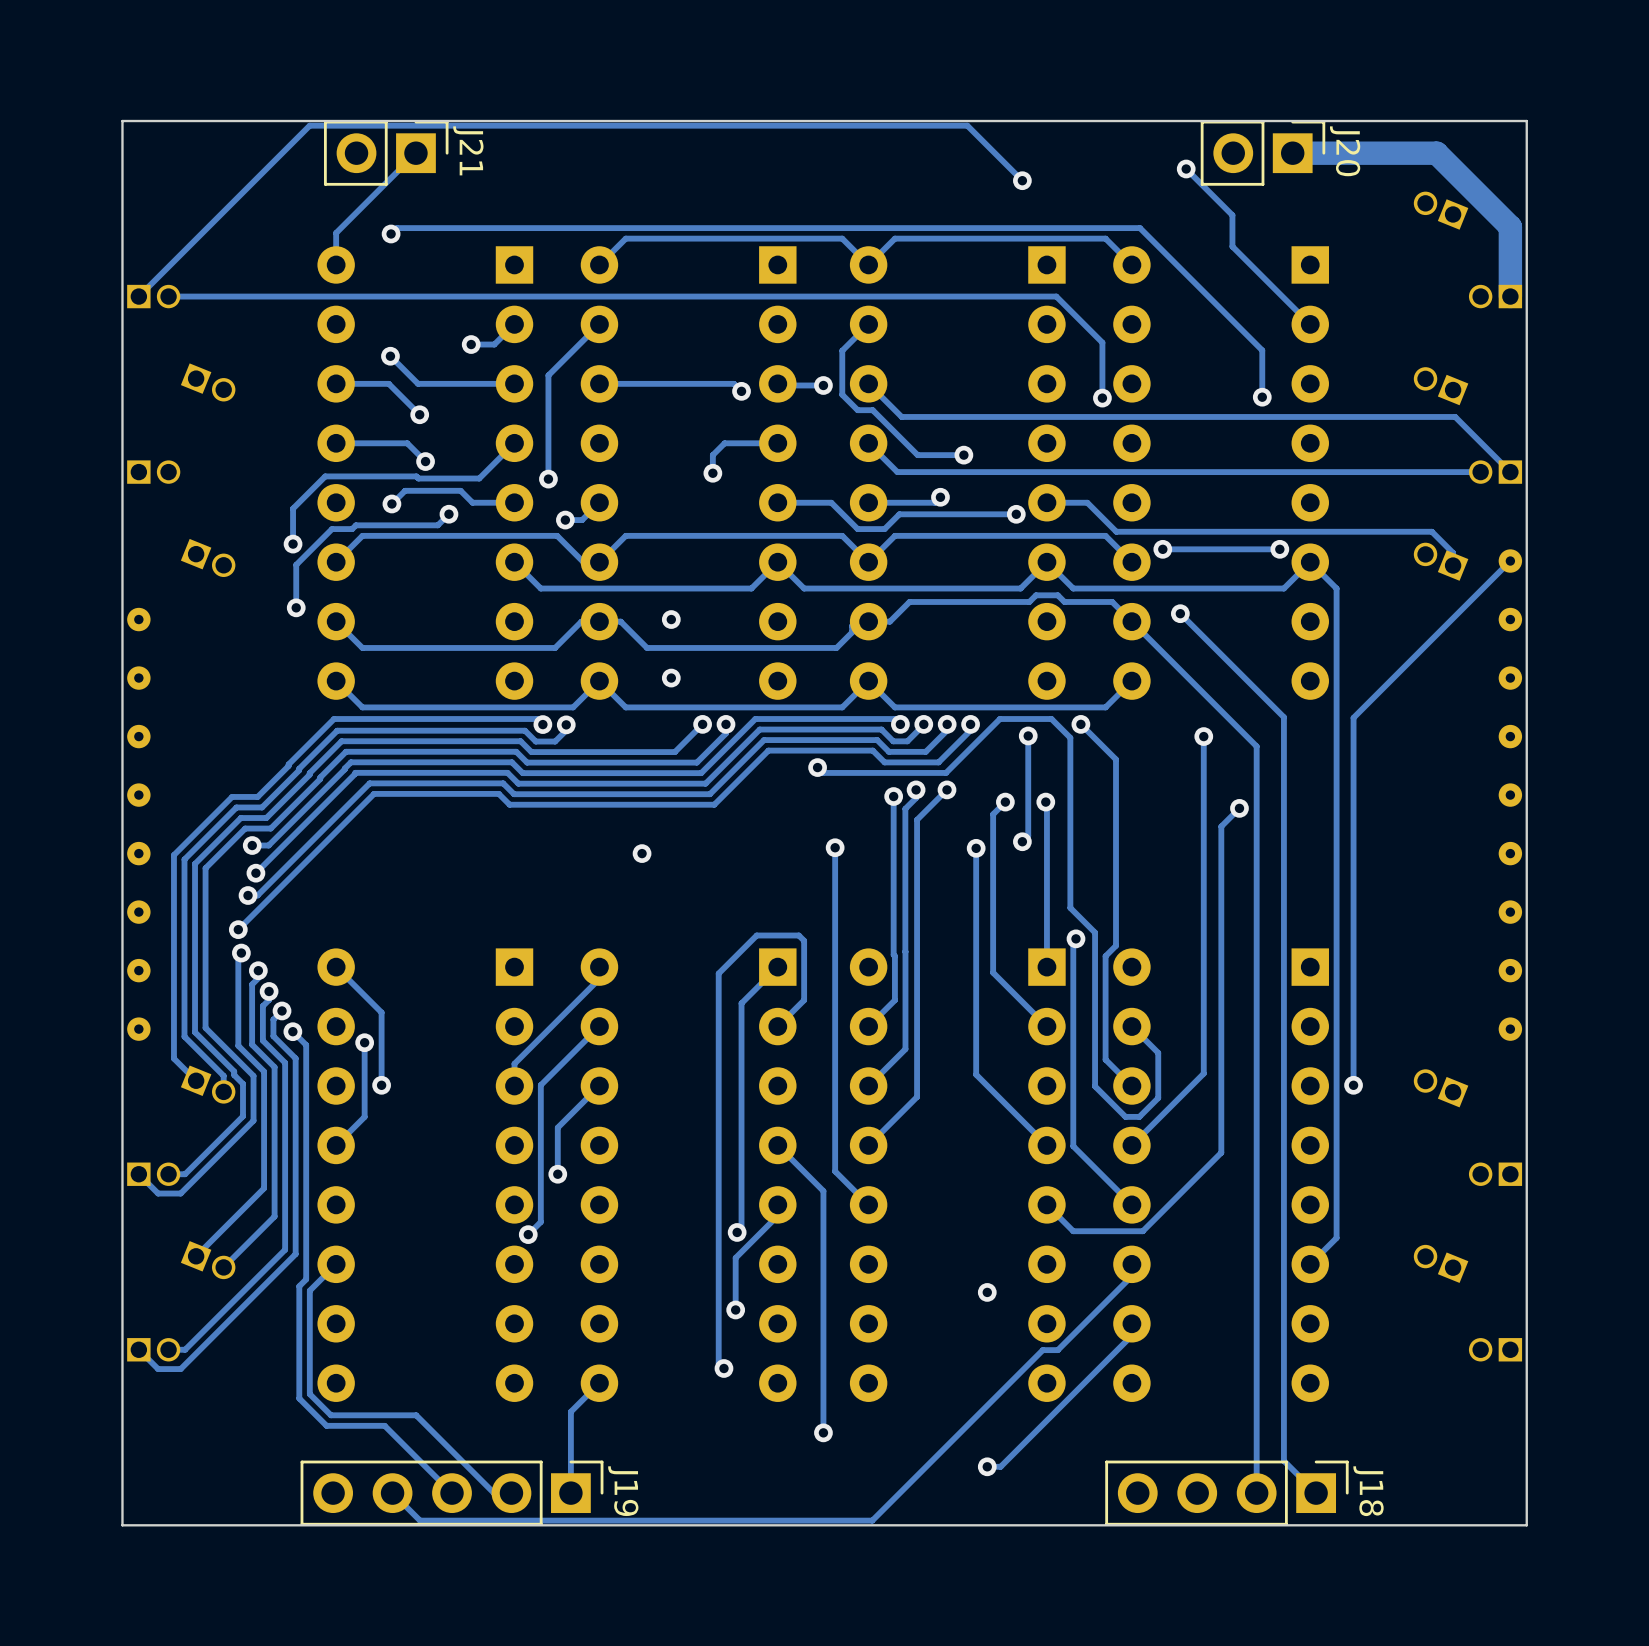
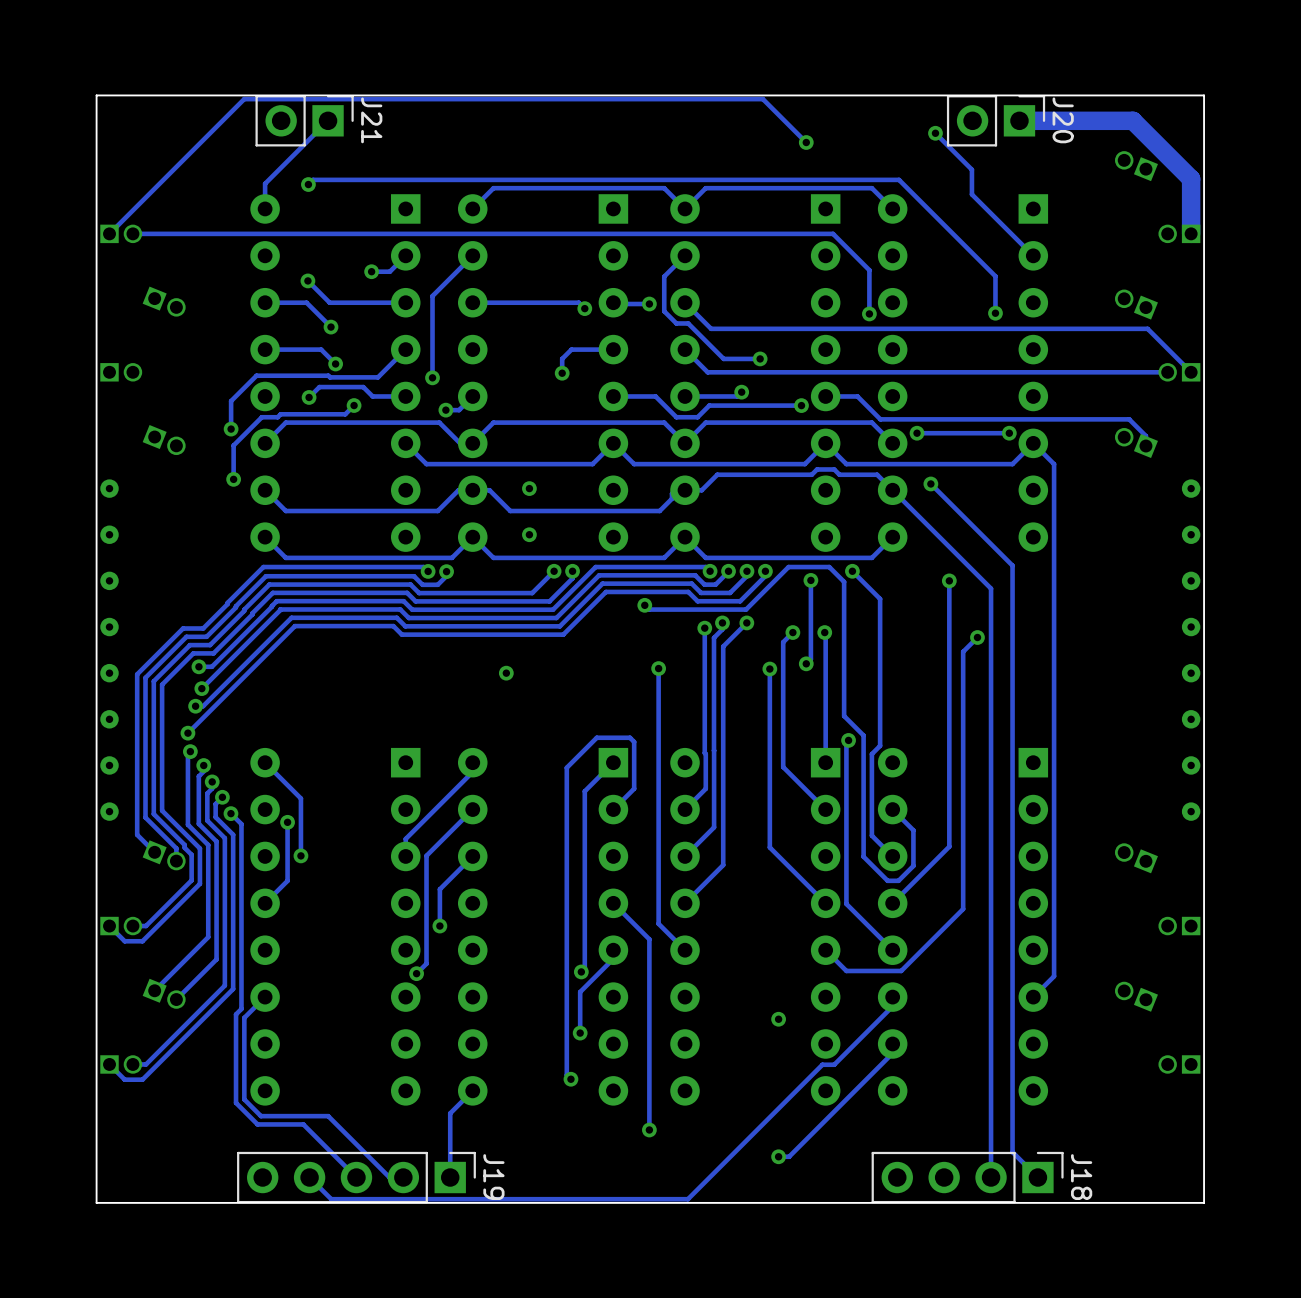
track: (1510, 561) (1353, 717) (1353, 1085) -> none
part: (1510, 561) -> none
via: (1353, 1085) -> none

